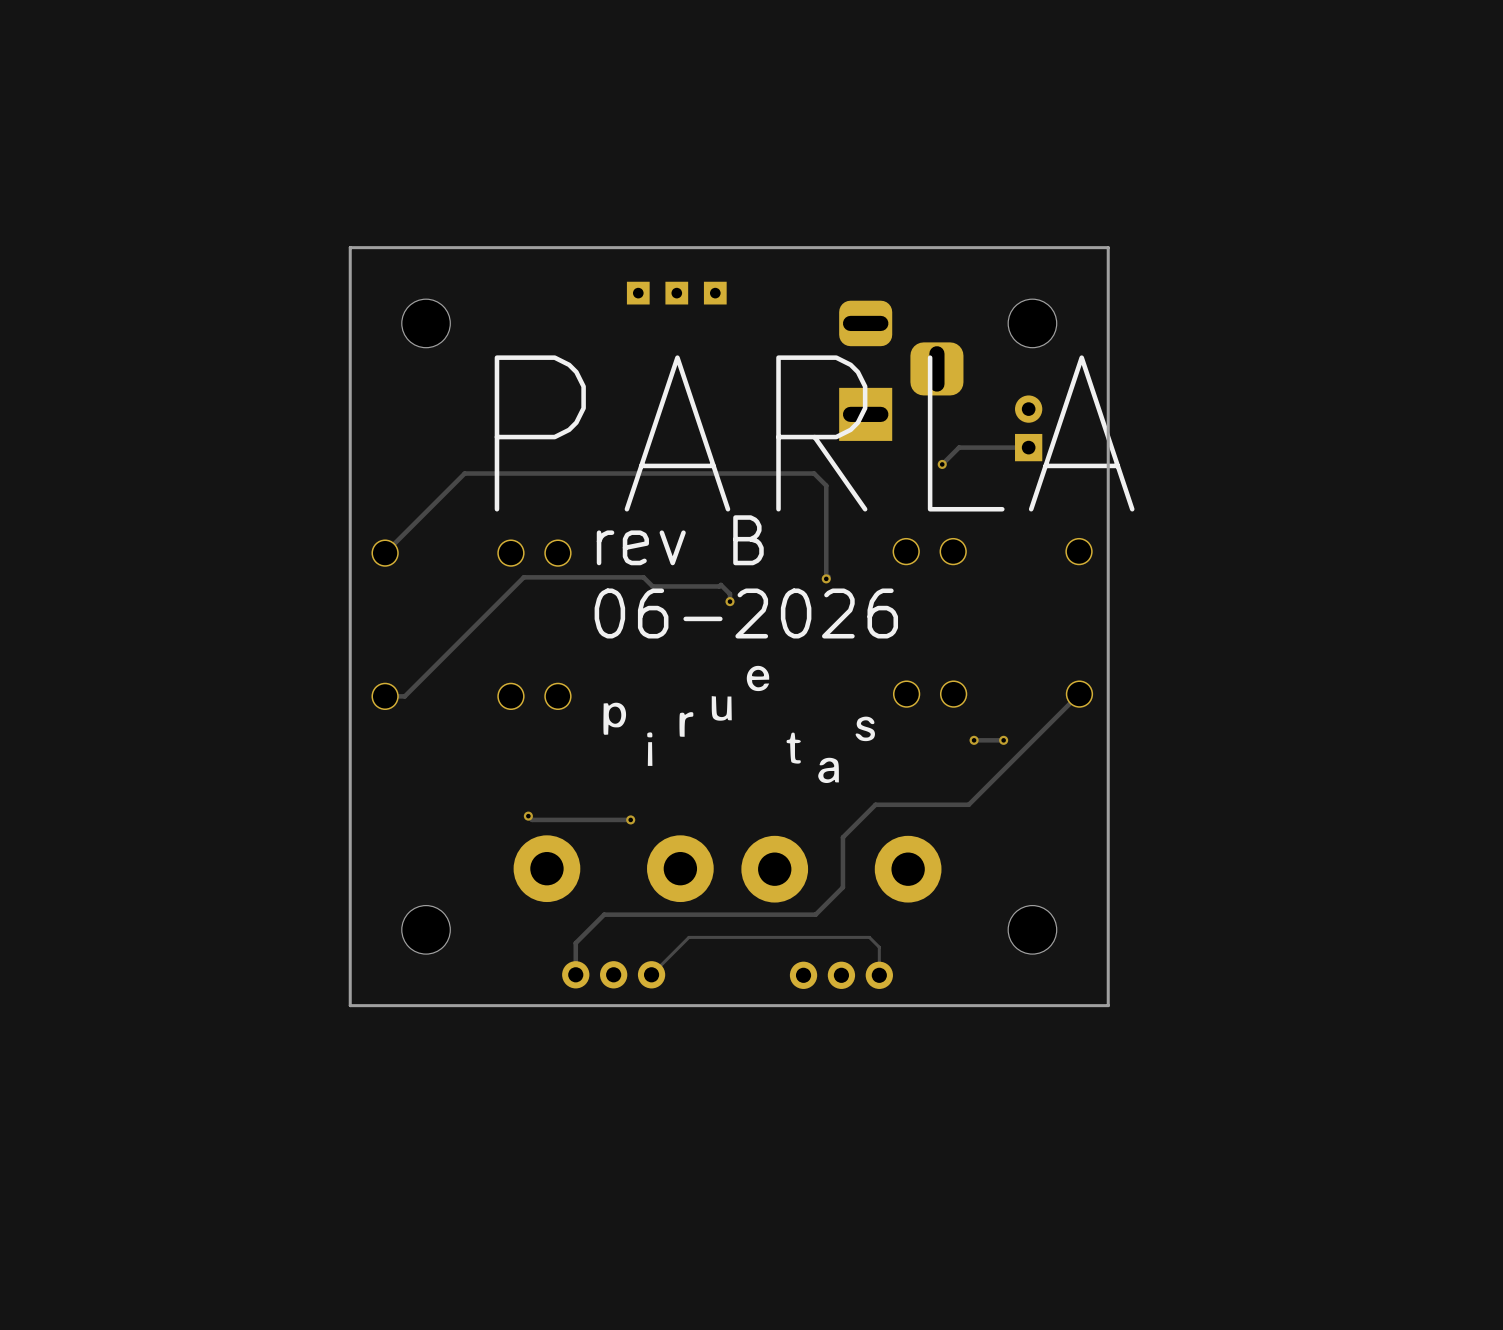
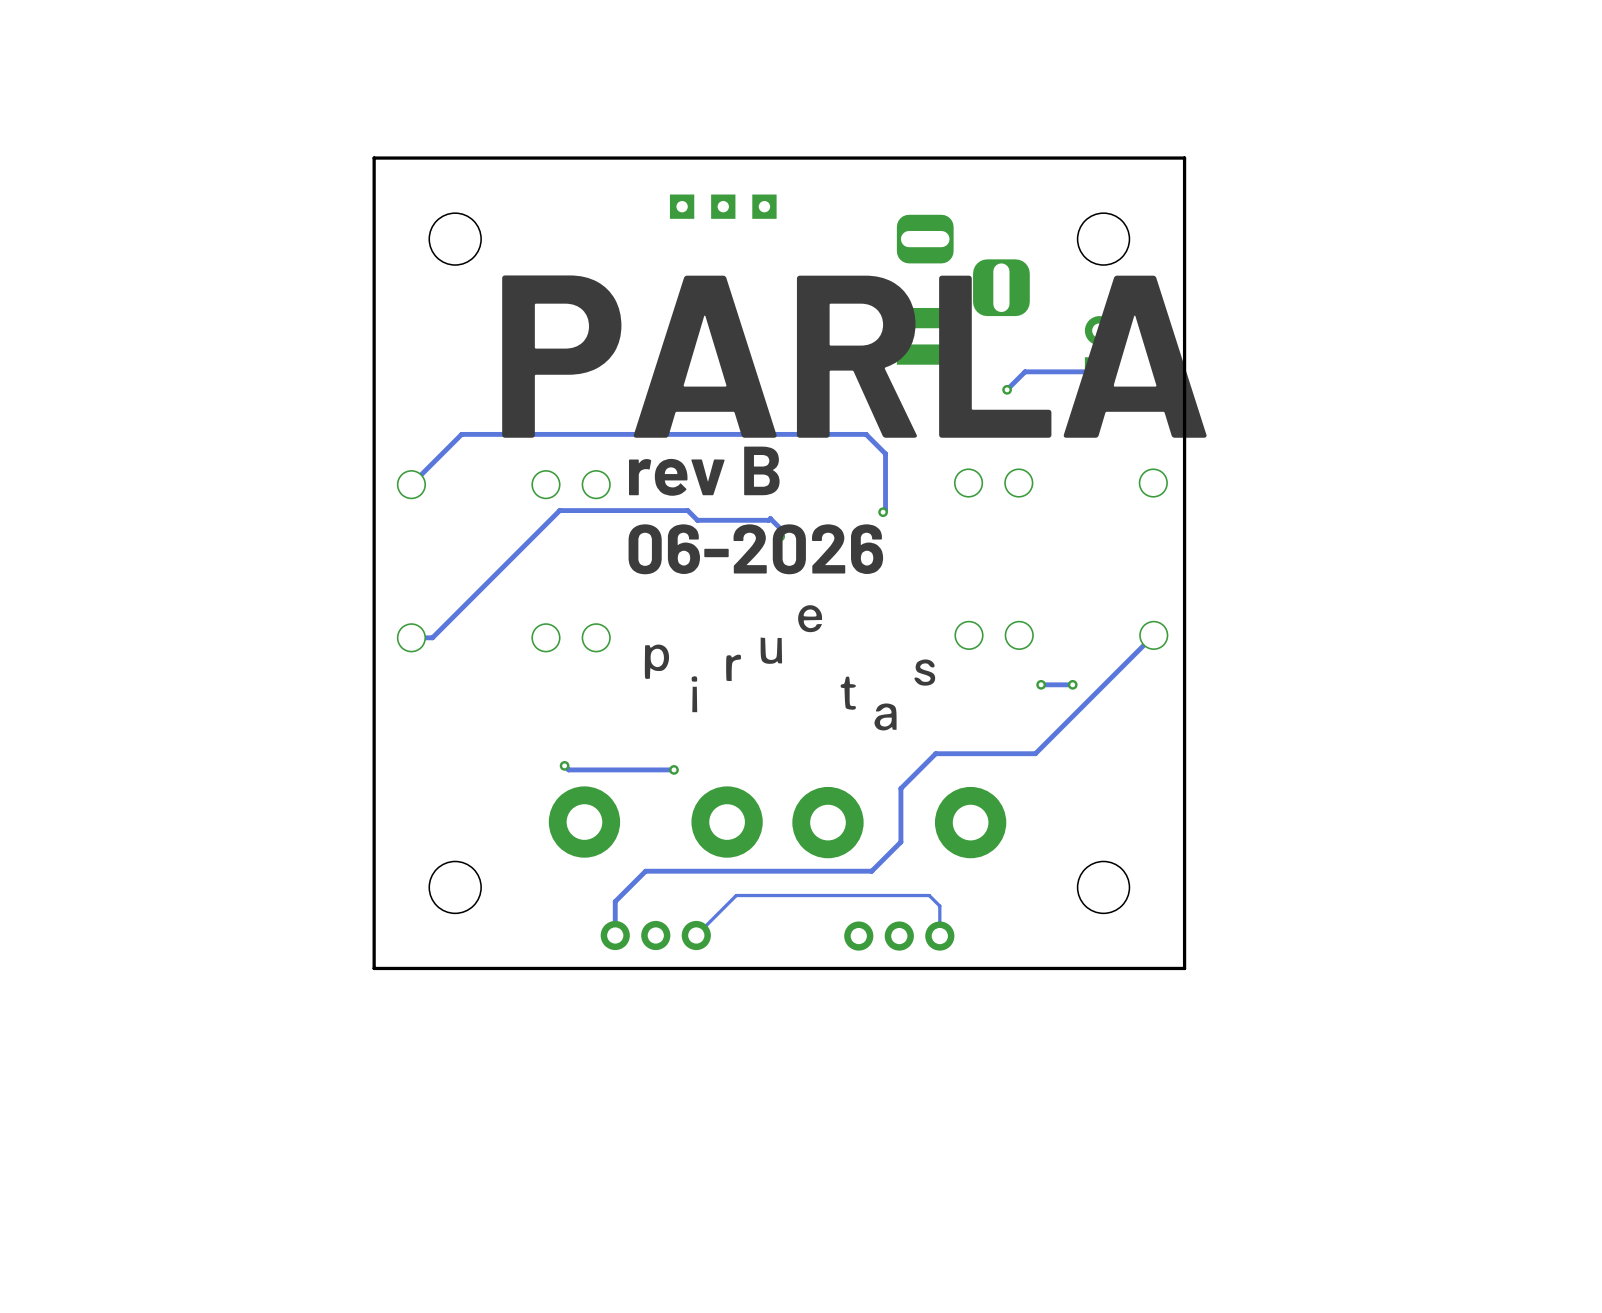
track: (432, 506) (464, 473) (814, 473) (826, 485) (826, 578) -> (461, 434) (866, 434) (885, 453) (885, 509)

